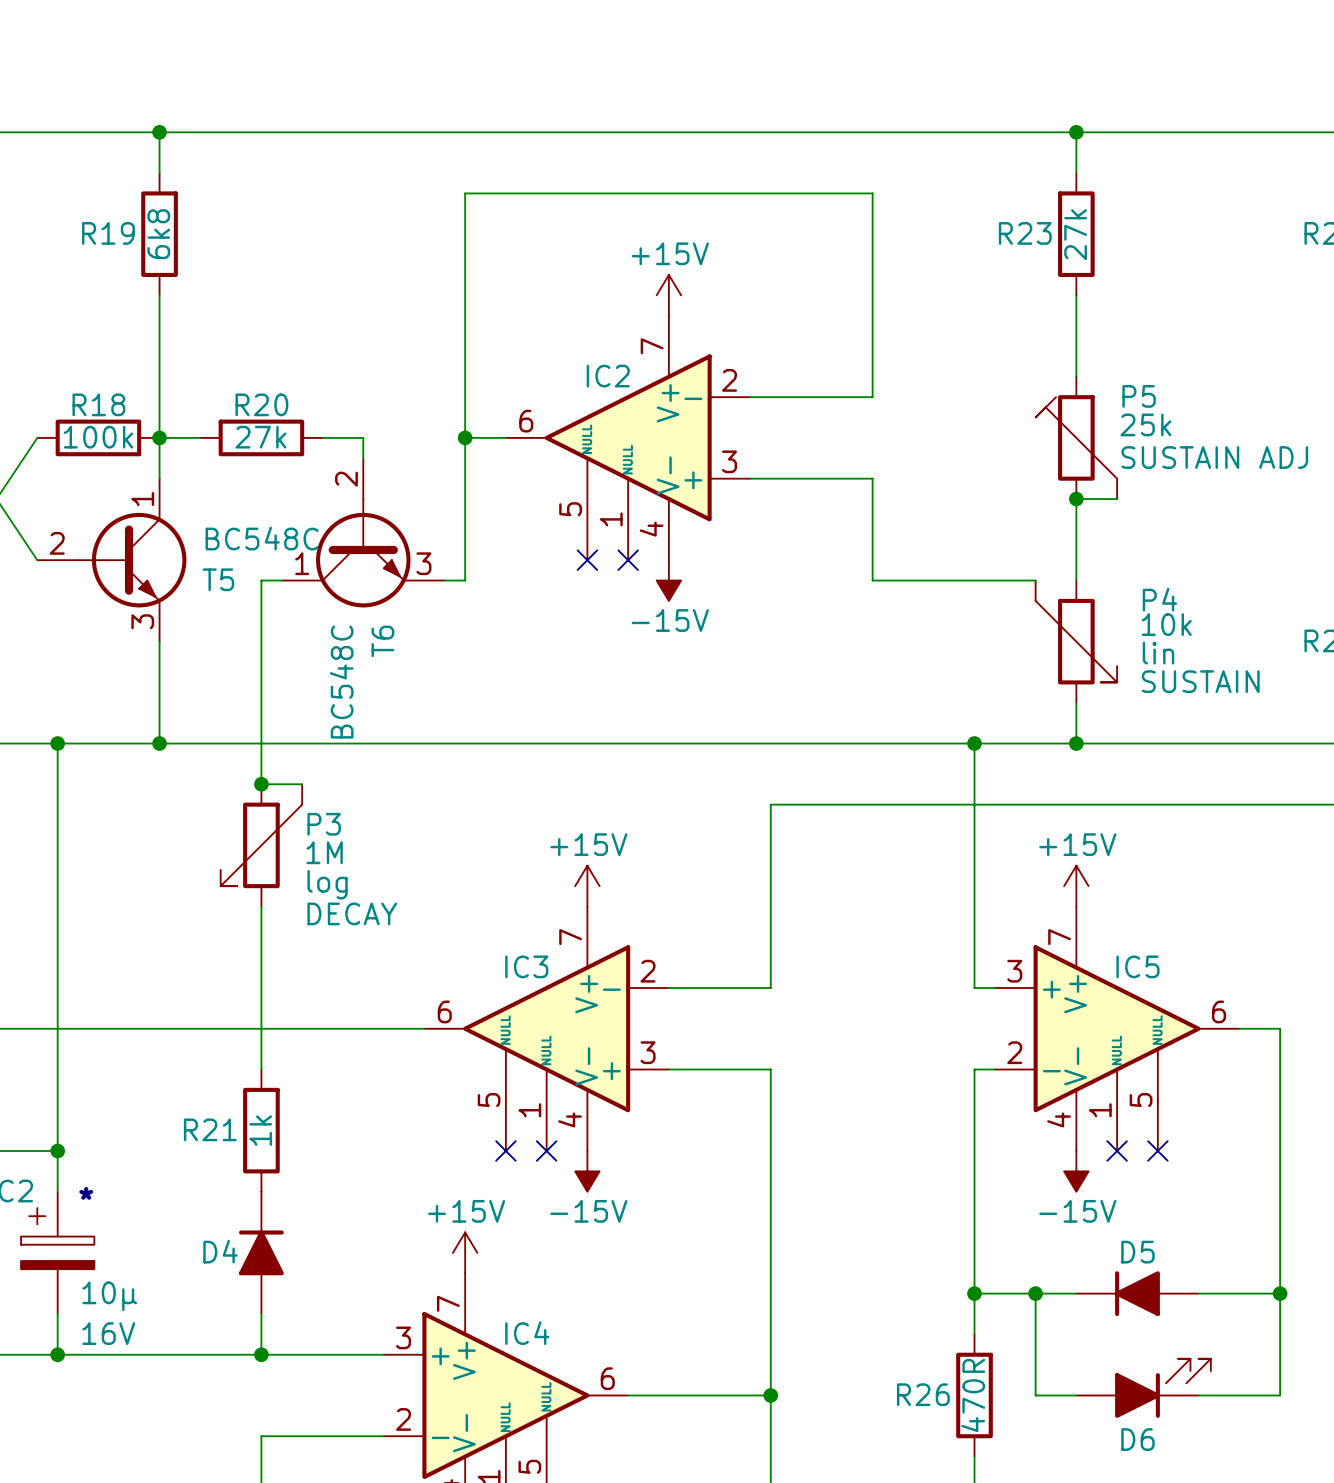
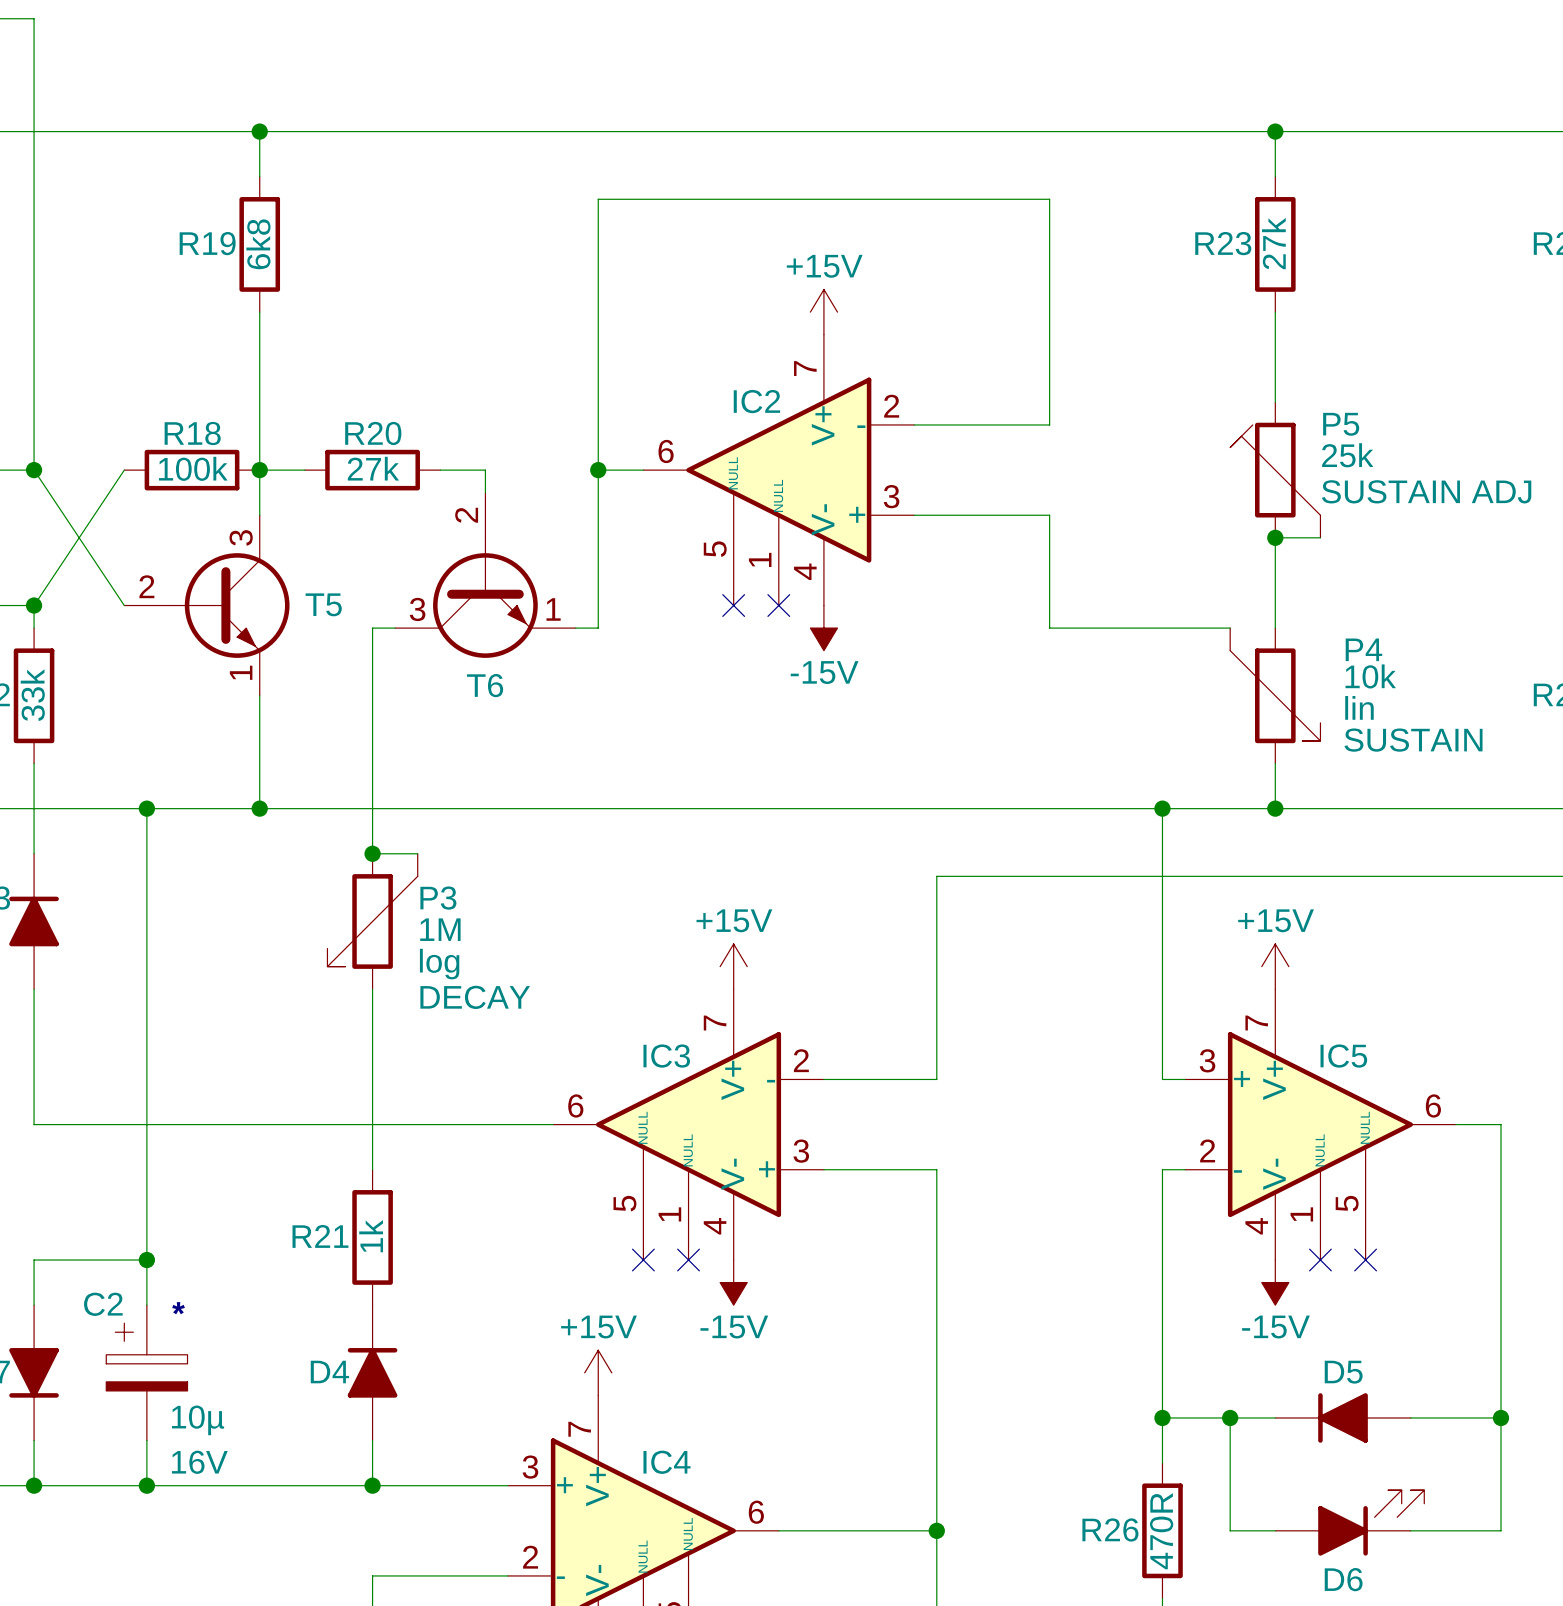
T5 pin number: 1 (142, 499) -> 3 (241, 537)
T5 value: BC548C (262, 538) -> none
T6 pin number: 1 (302, 563) -> 3 (417, 609)
T6 pin number: 3 (423, 563) -> 1 (553, 609)
T5 name position: T5 (218, 579) -> T5 (323, 604)
T5 pin number: 3 (142, 621) -> 1 (241, 672)
T6 name rotation: 0° (382, 641) -> 90° clockwise (485, 685)
T6 value: BC548C (341, 682) -> none

